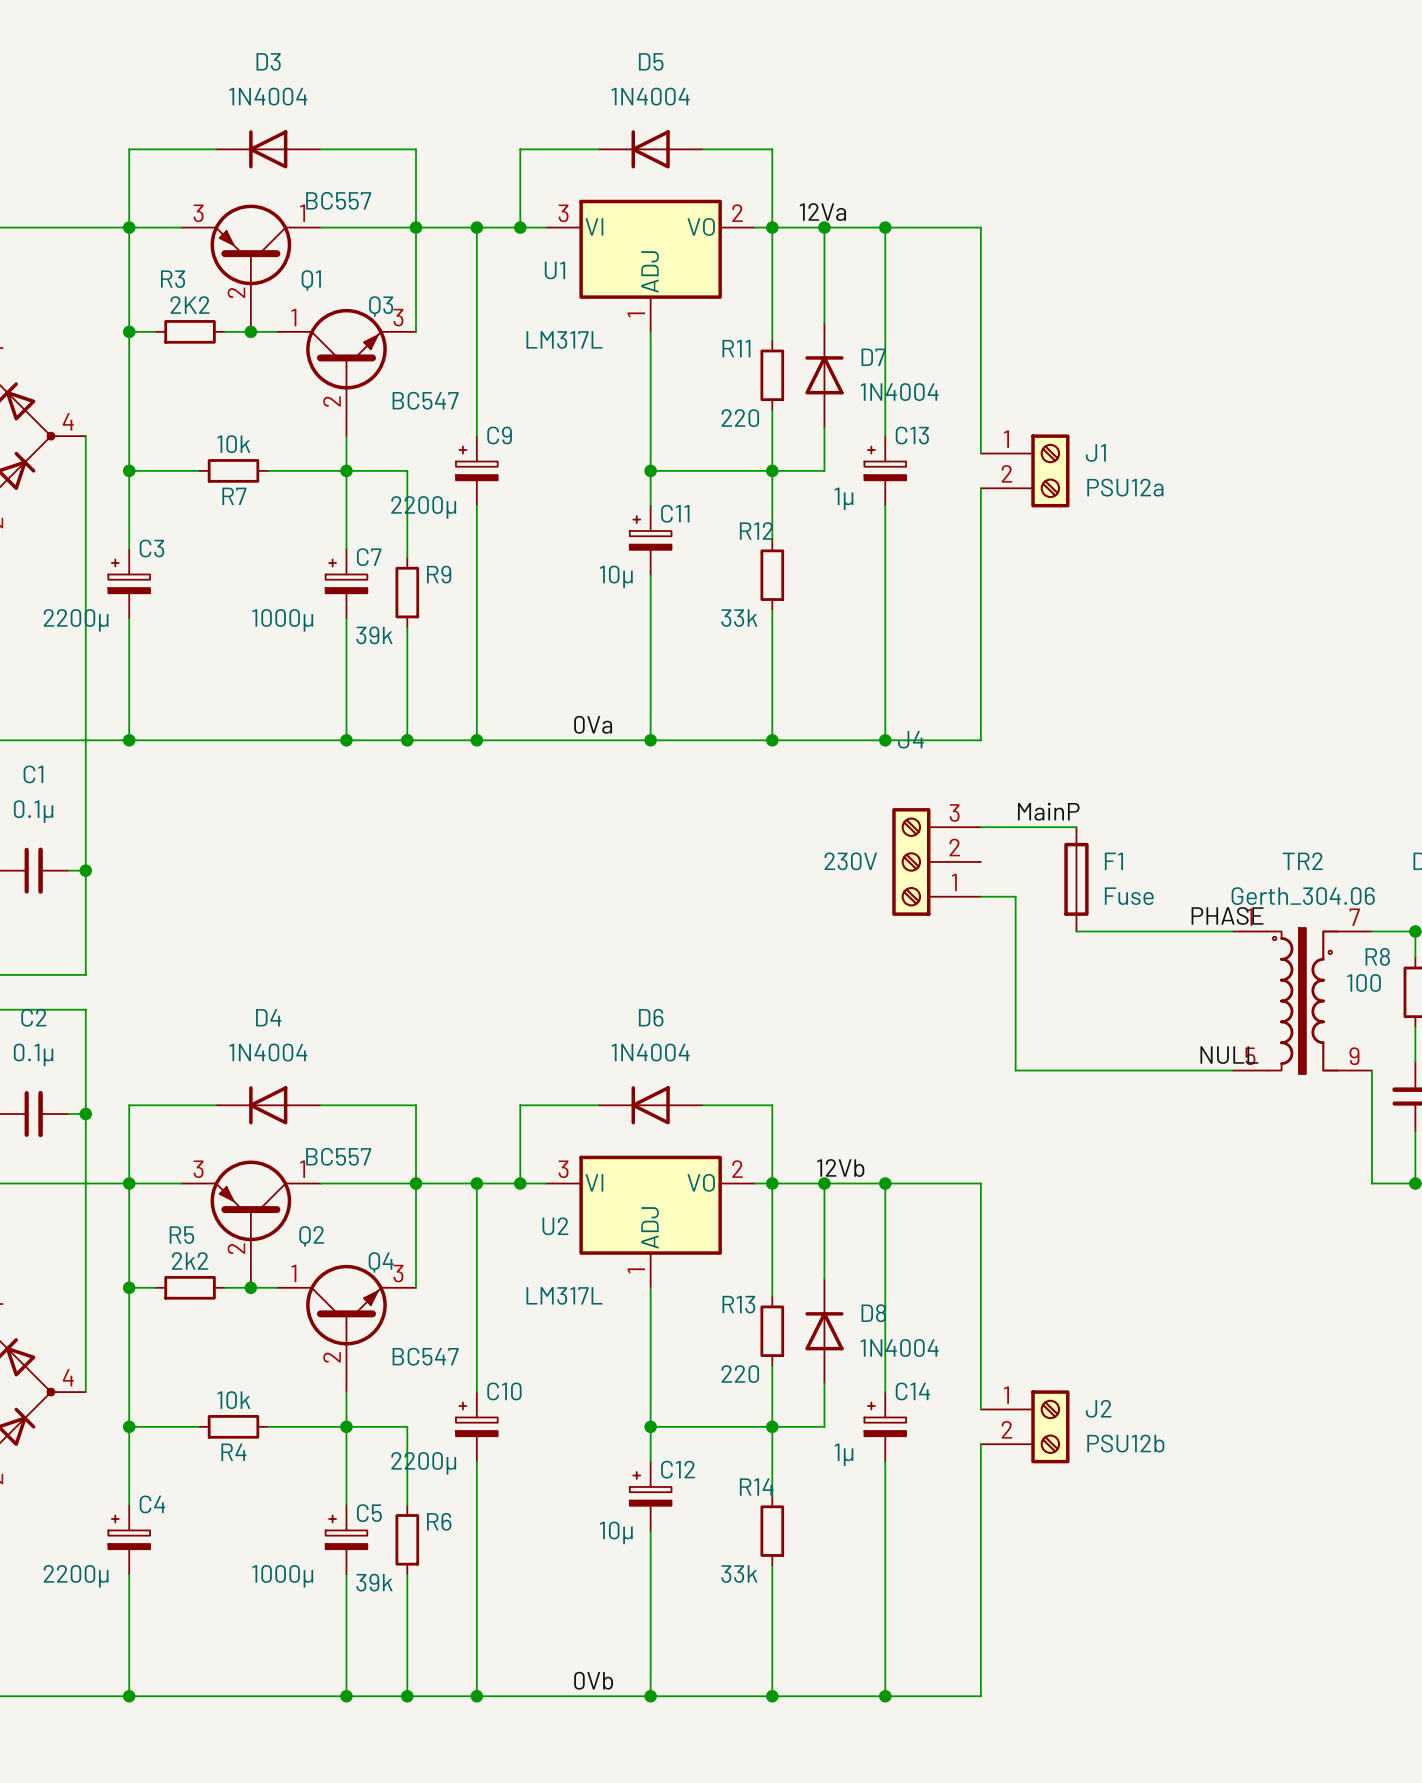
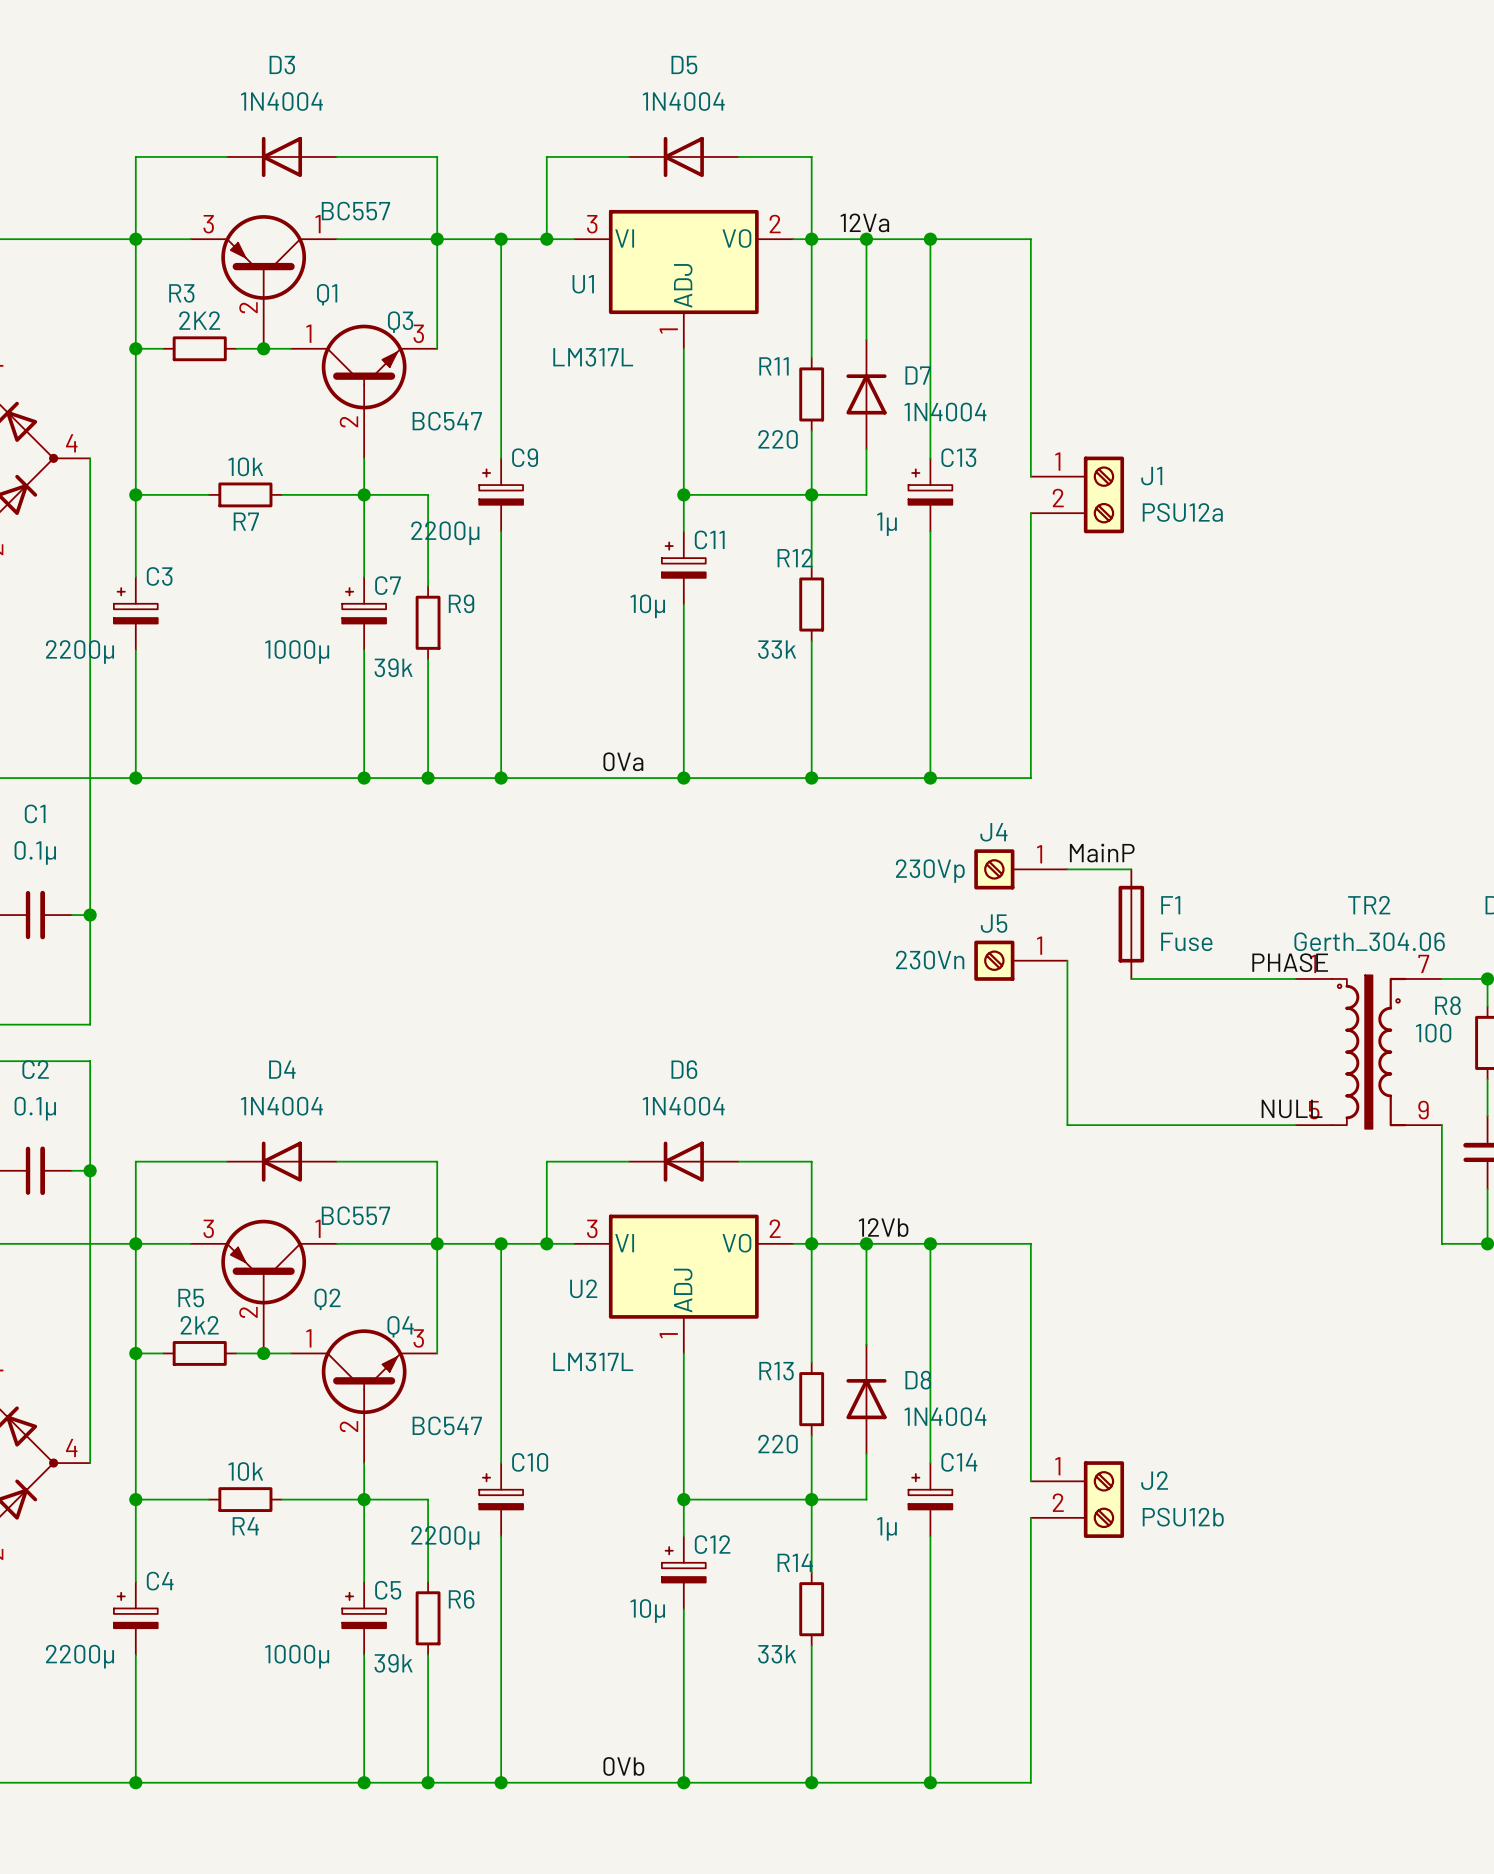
J4 name position: J4 (910, 739) -> J4 (993, 832)
J4 symbol: [892, 808, 981, 916] -> [974, 849, 1068, 890]
J4 value: 230V (850, 861) -> 230Vp (930, 871)
wire: (980, 896) (1015, 896) (1015, 914) -> none
J5: none -> 230Vn (1020, 960)

